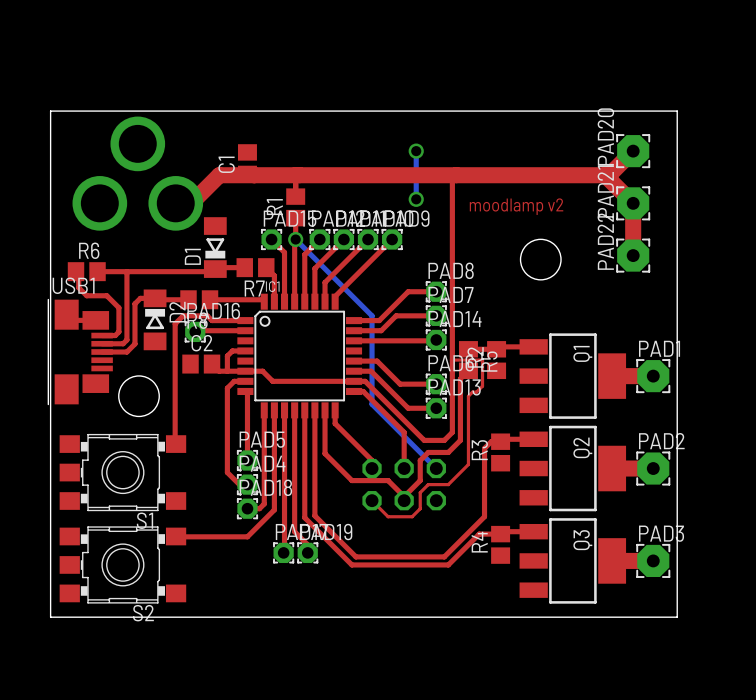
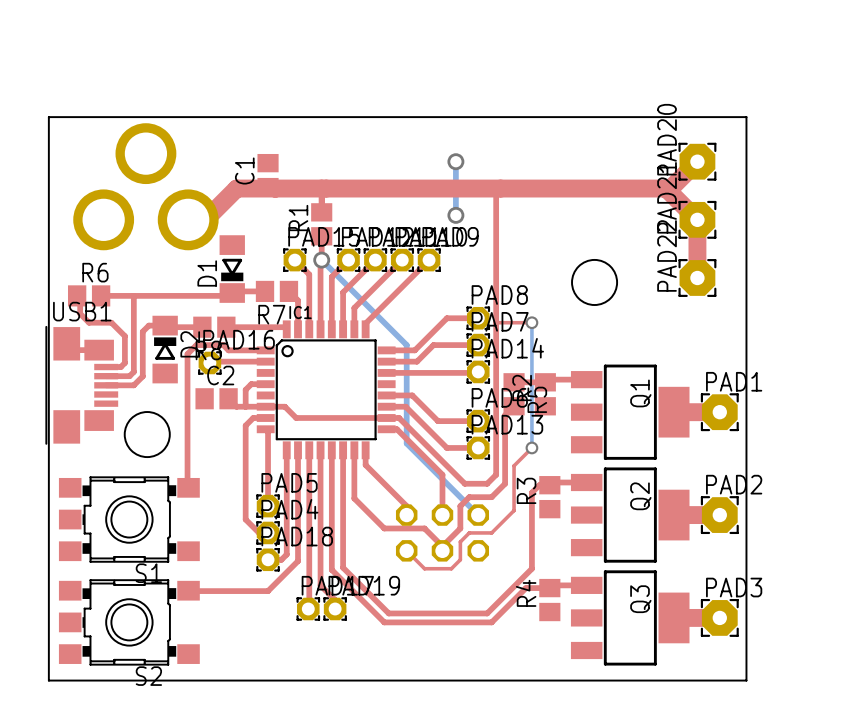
text: moodlamp v2 (516, 206) -> none
top track: none -> (496, 322) (531, 322)
bottom track: none -> (531, 322) (531, 447)
via: none -> (531, 322)
top track: (452, 360) (482, 360) (482, 386) (468, 396) (468, 424) -> (531, 447) (514, 465)
via: none -> (531, 447)

